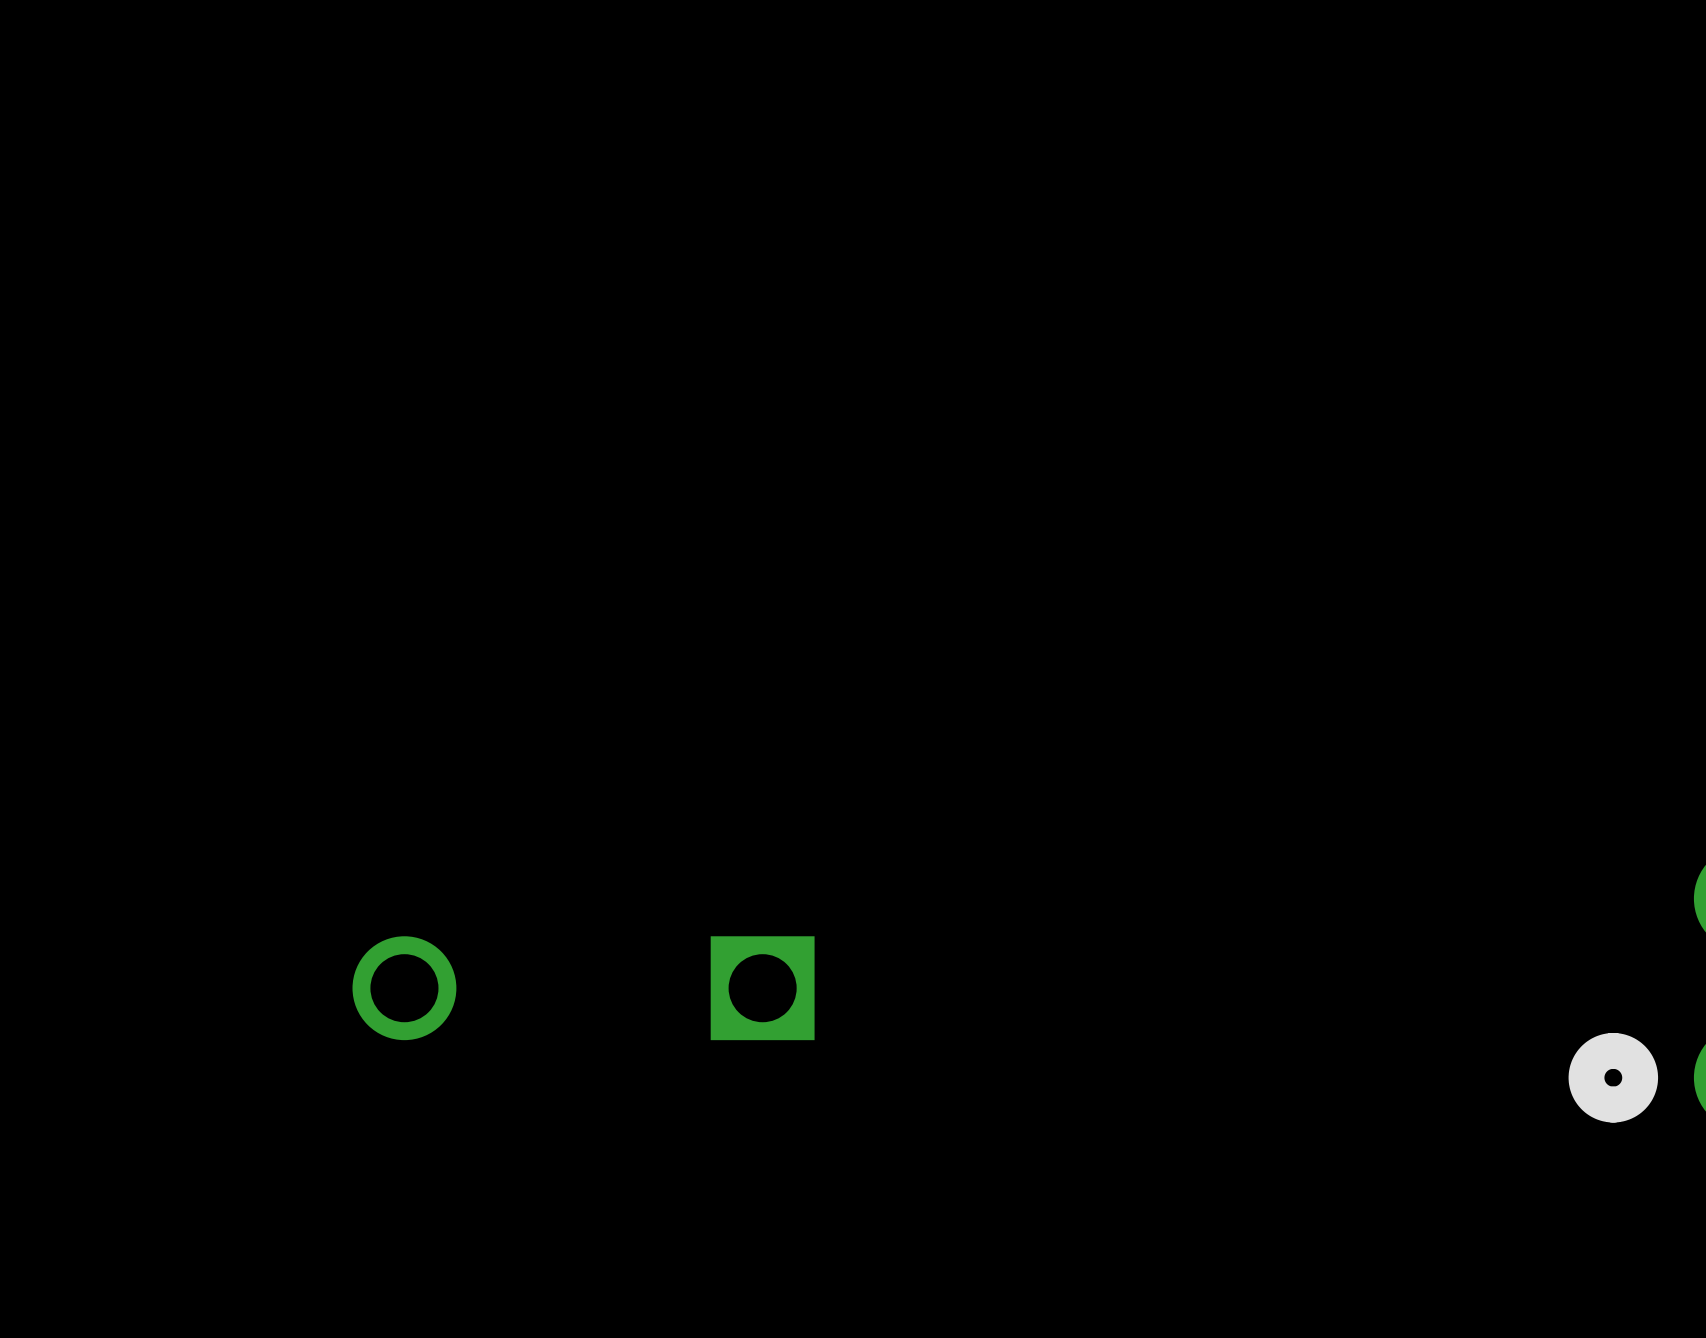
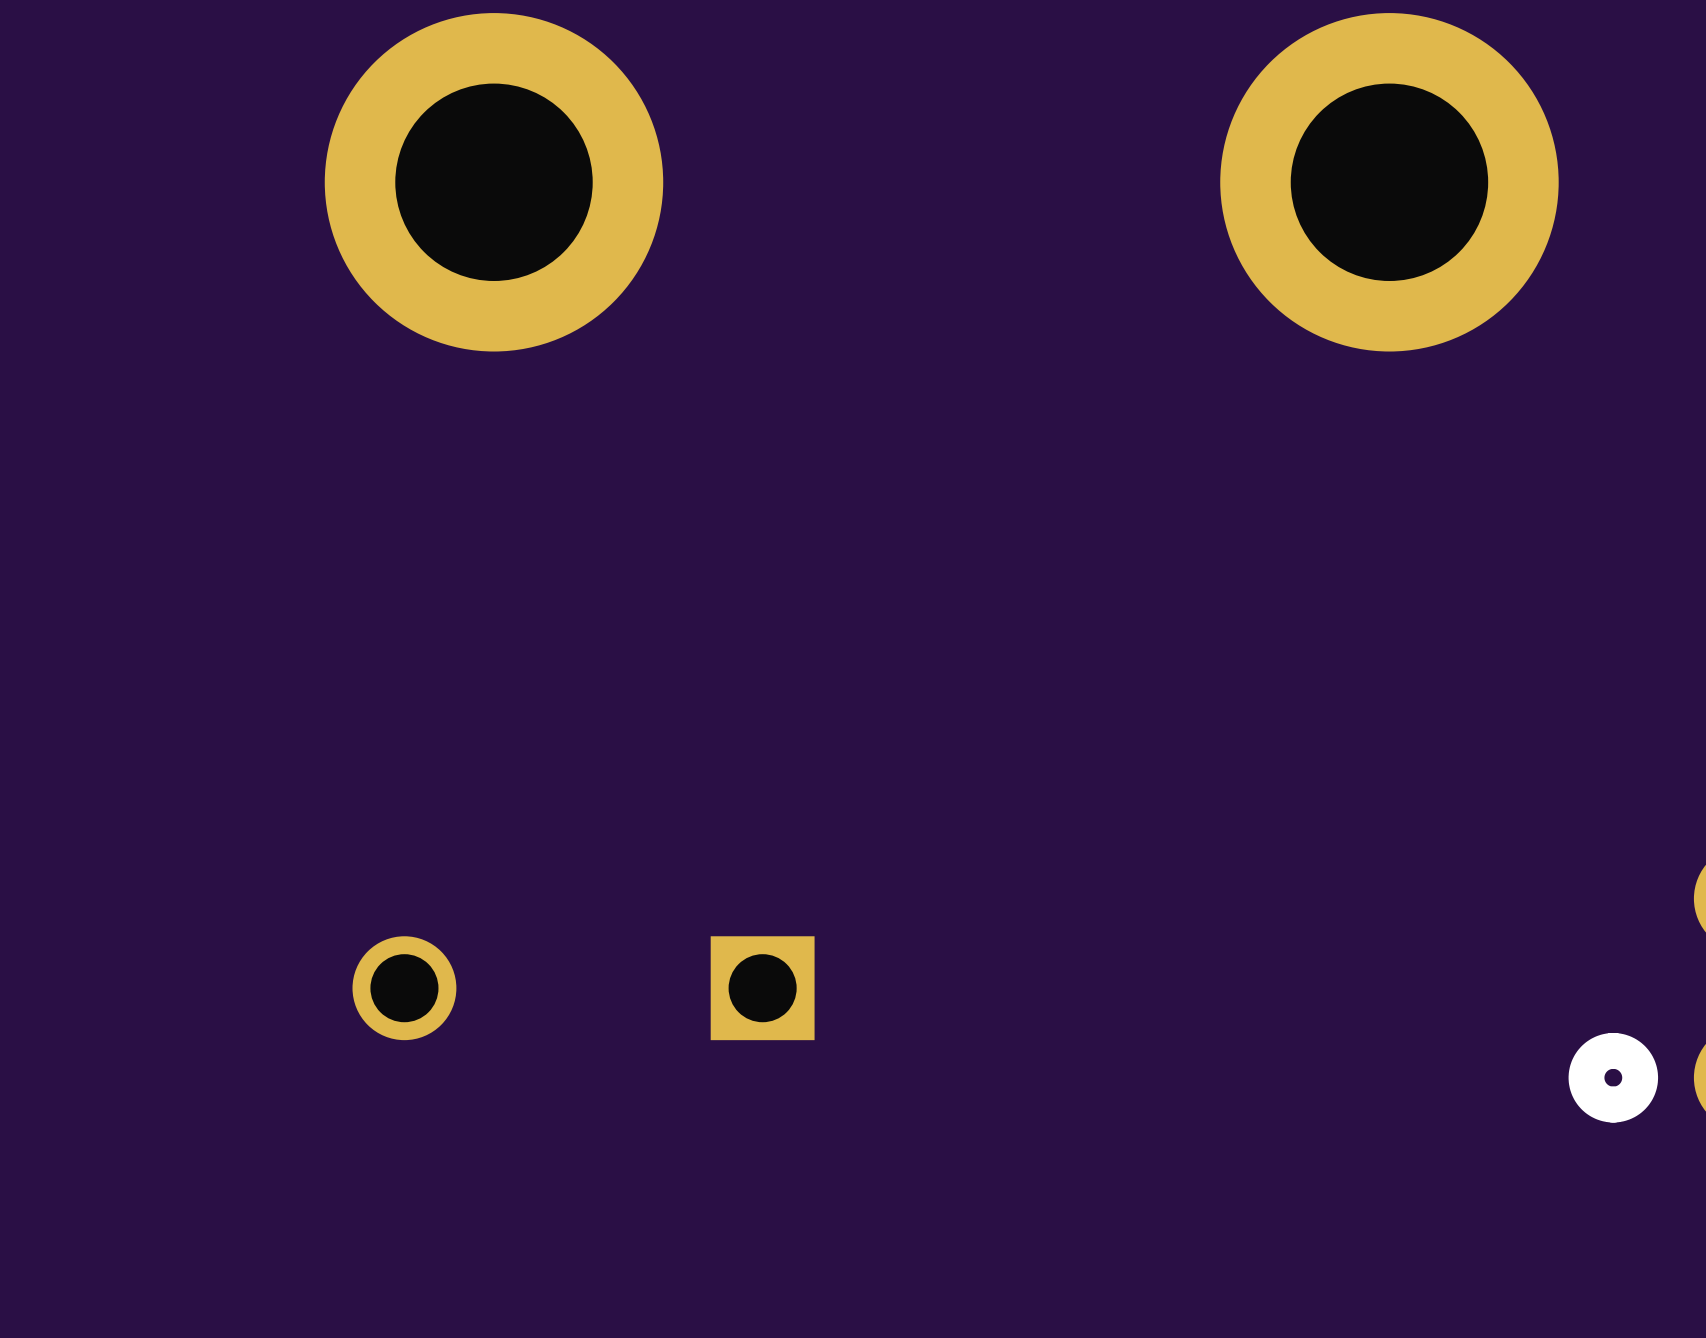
part: none -> (493, 182)
part: none -> (1389, 182)

